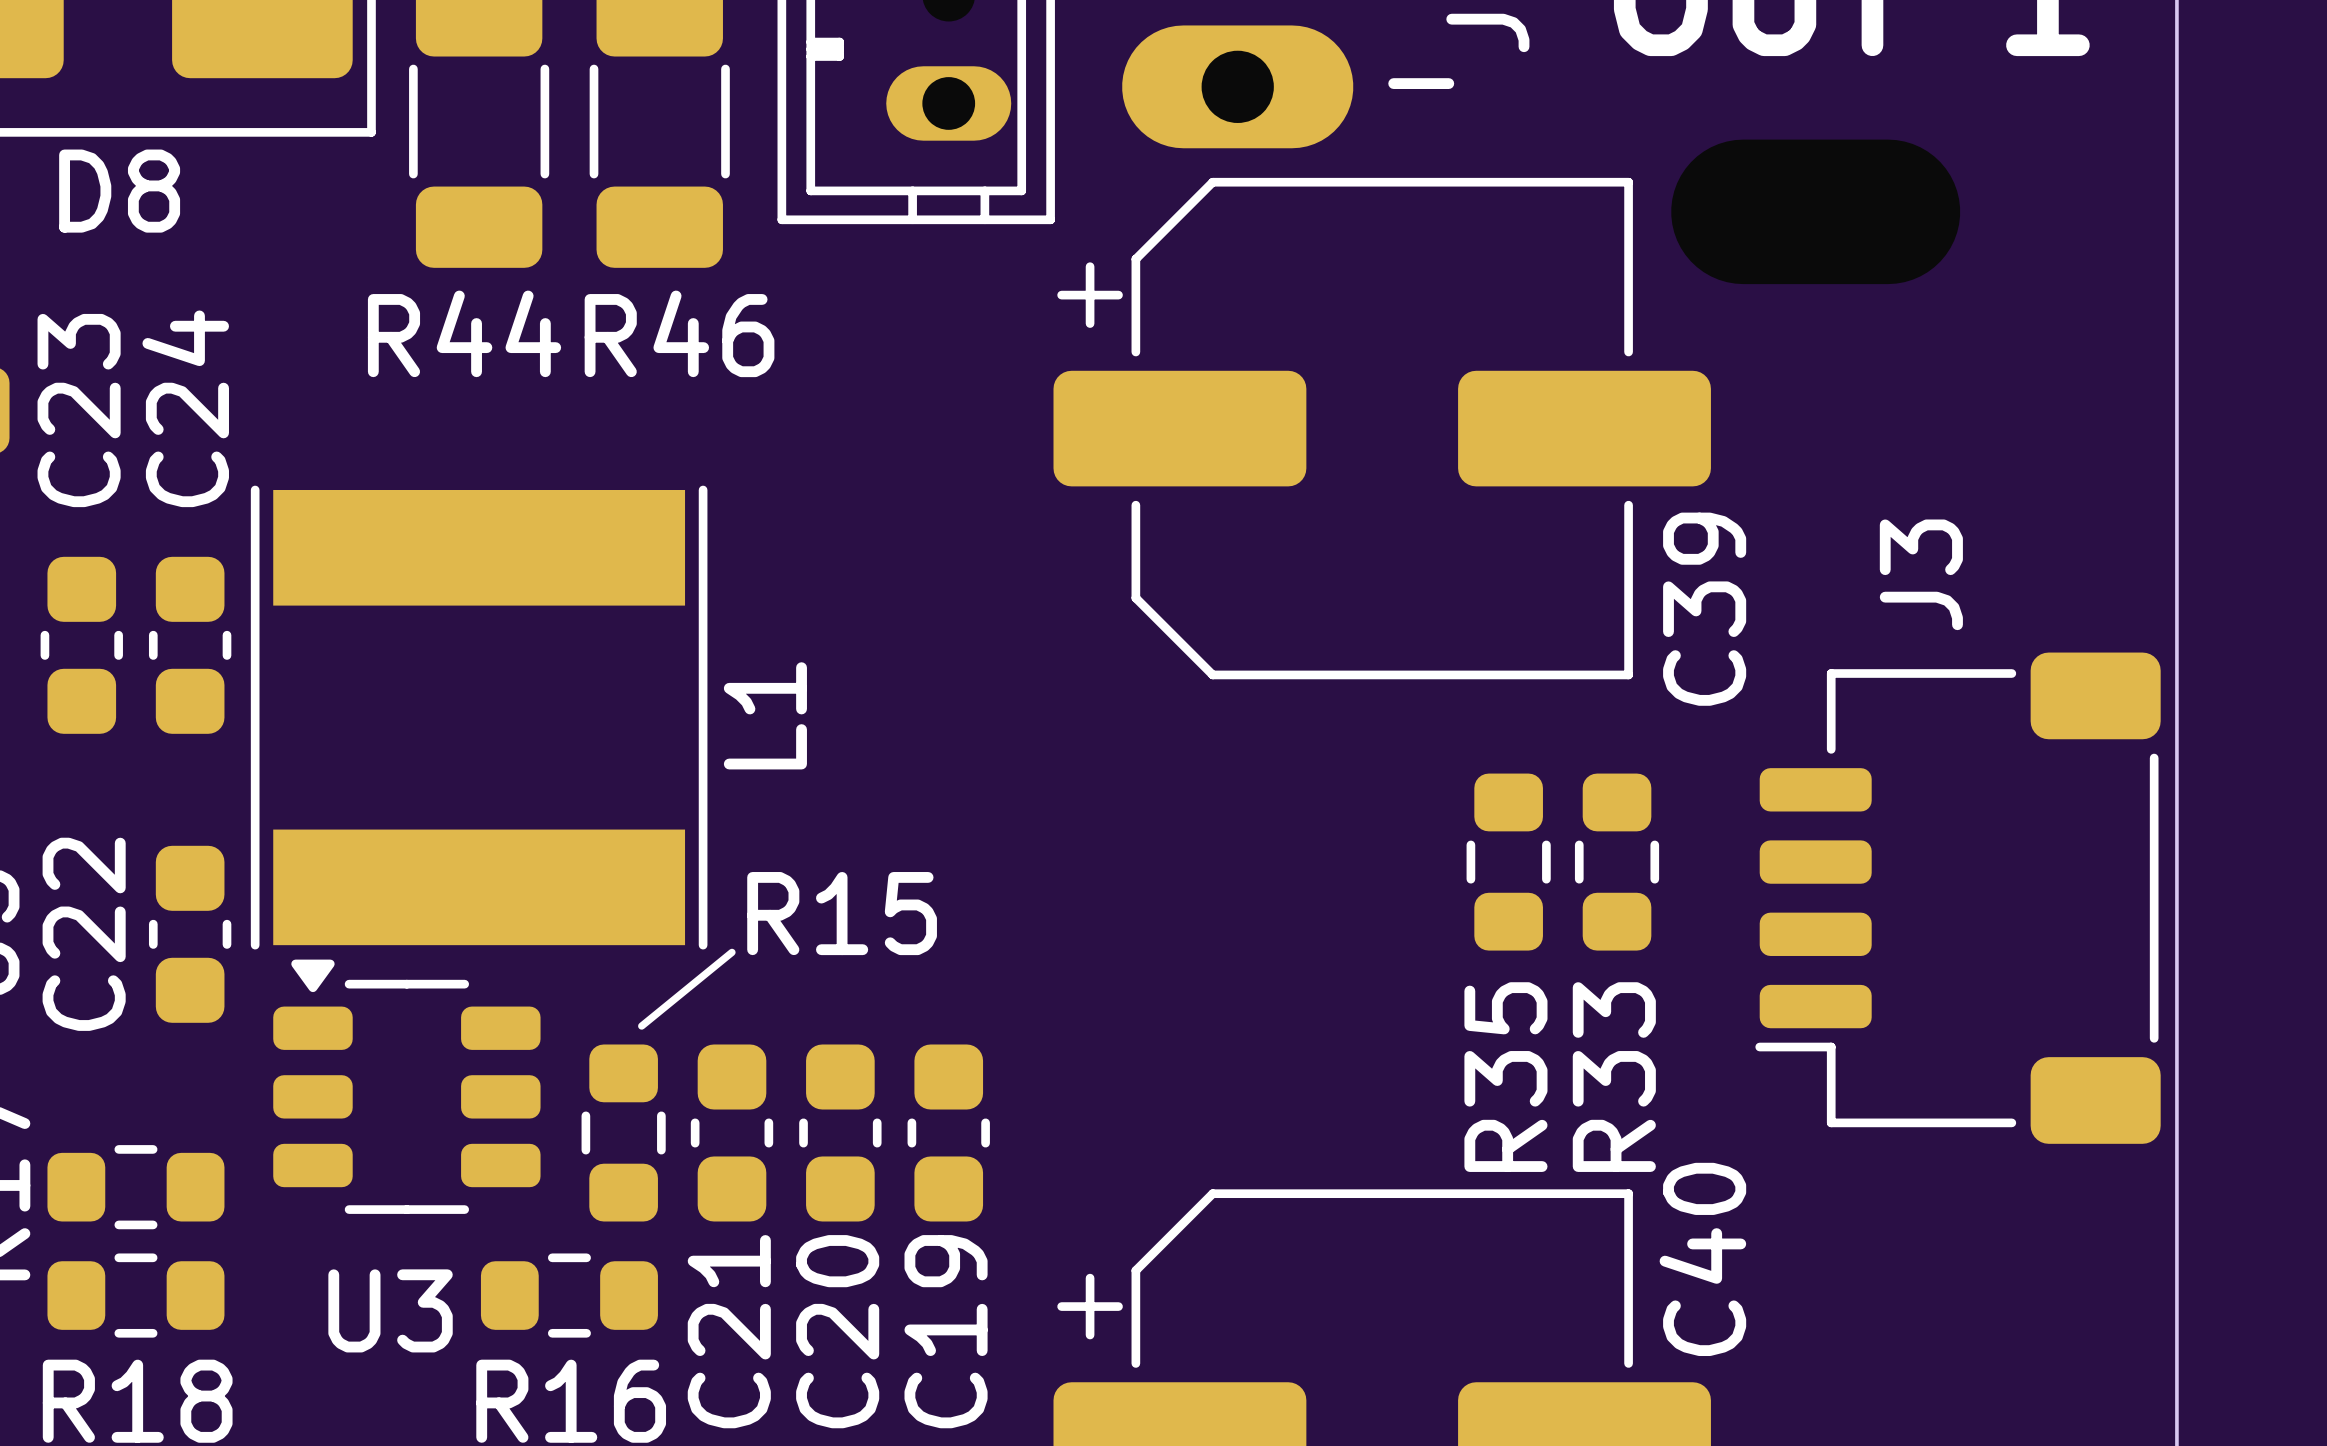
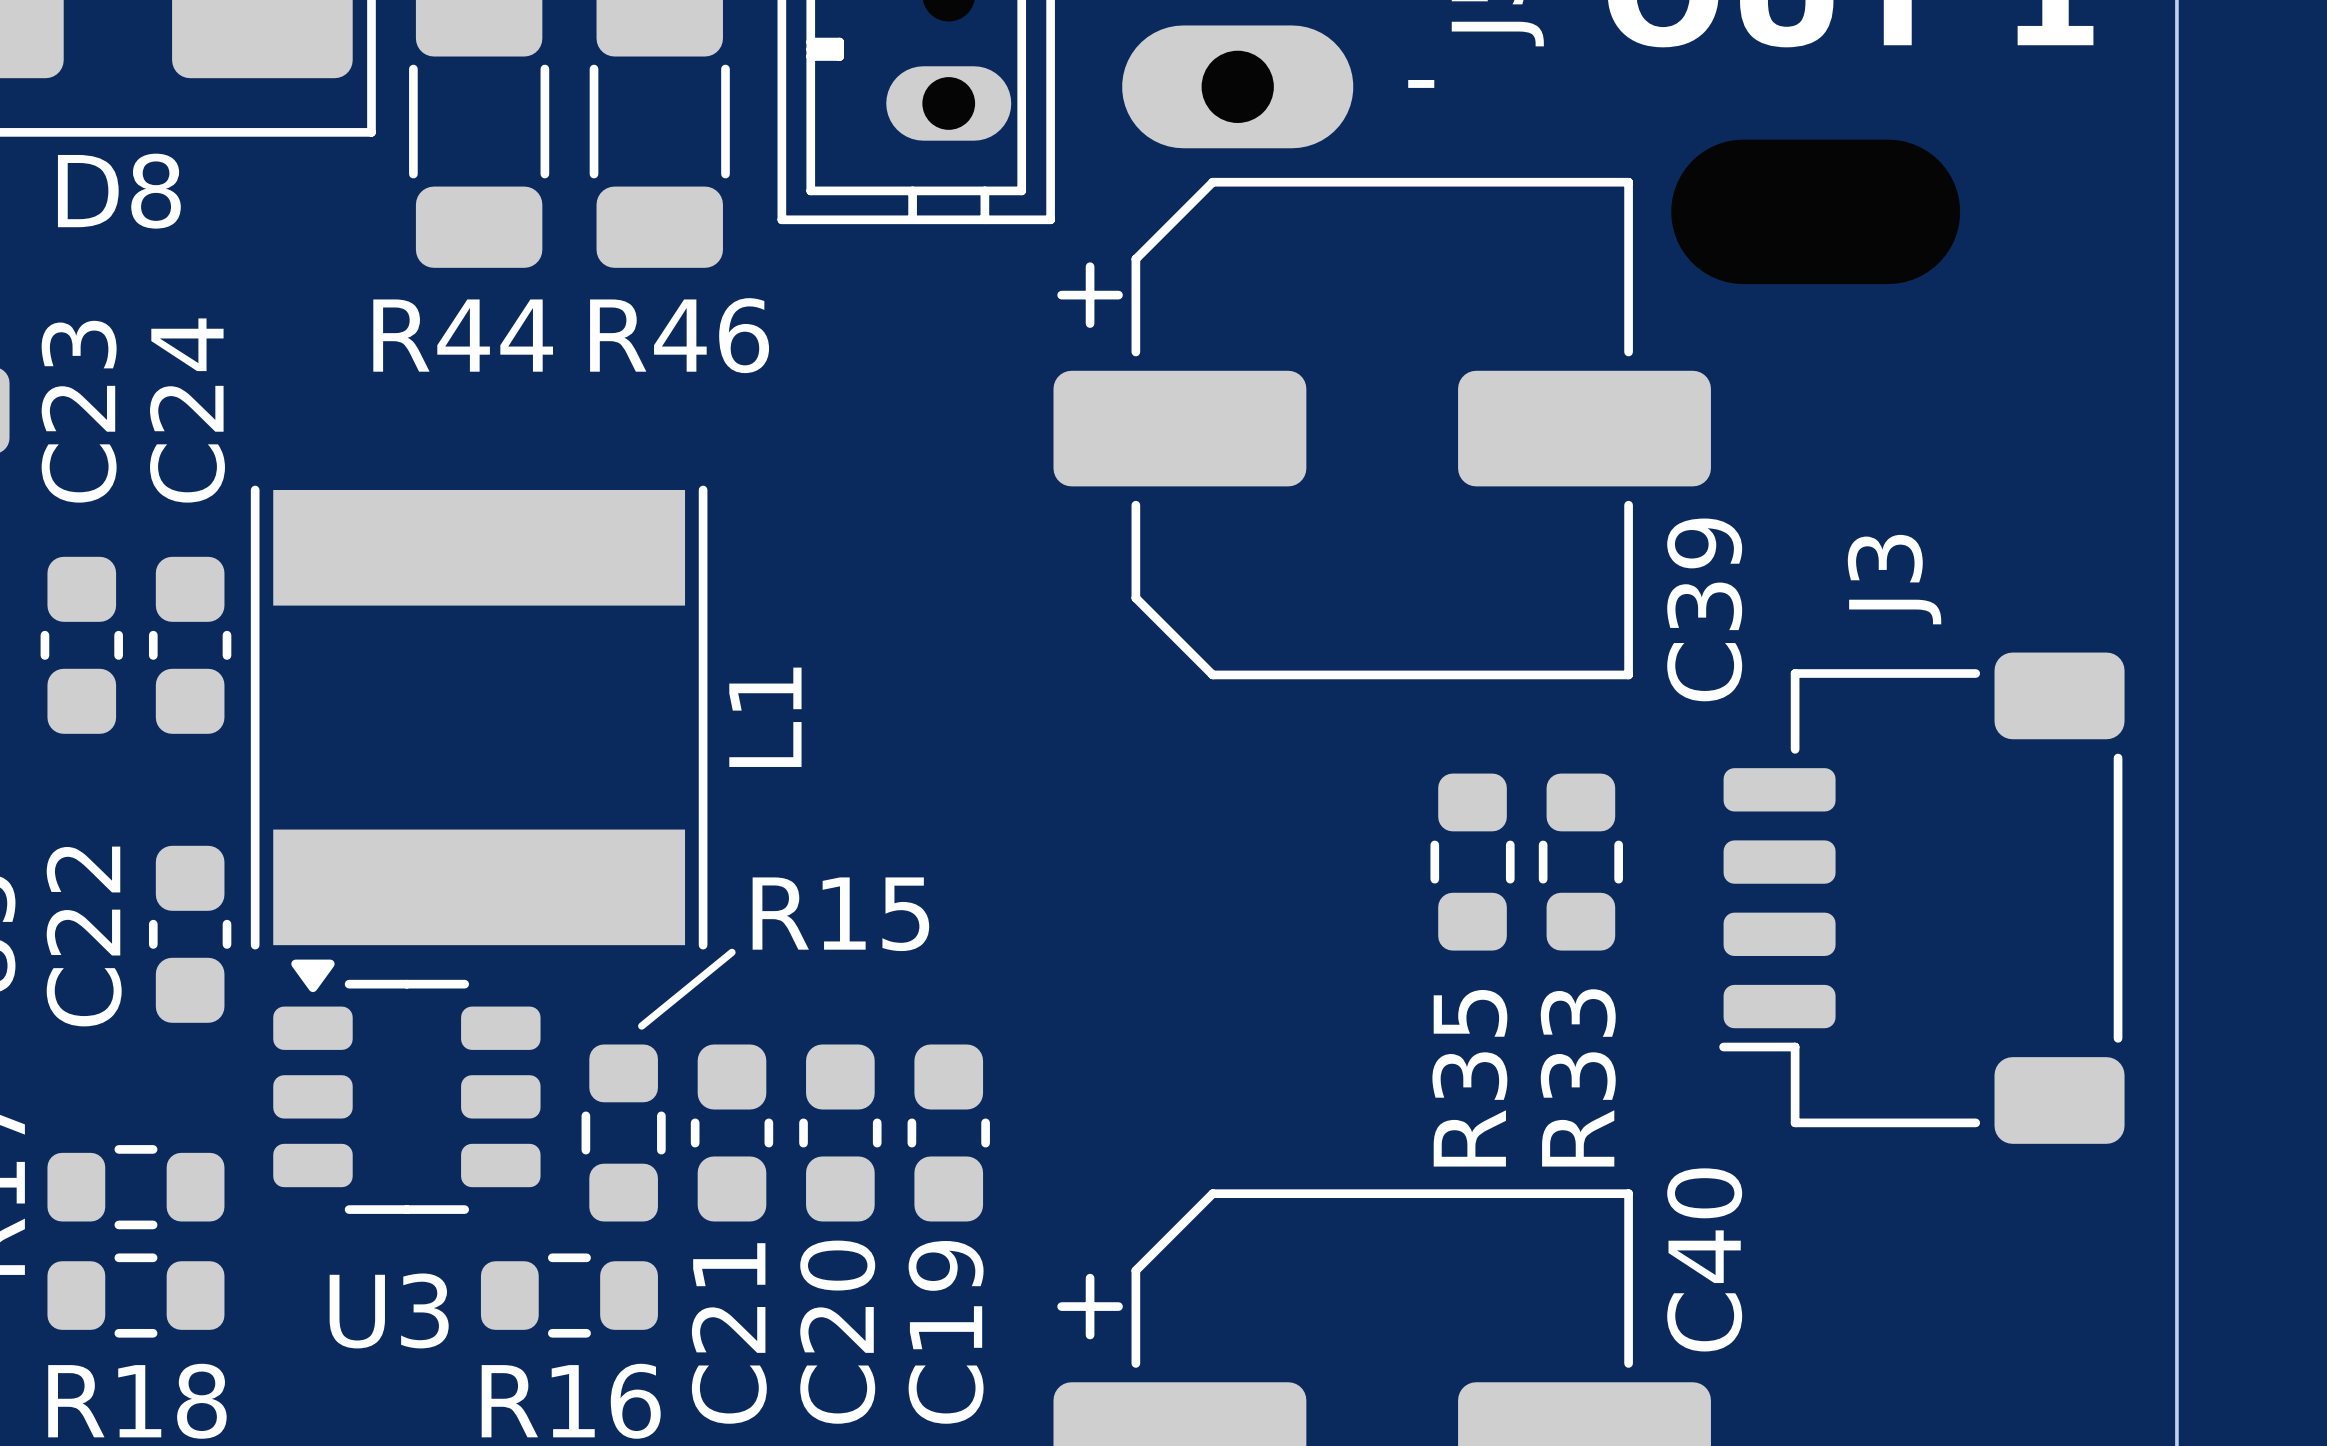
R35 position: (1508, 862) -> (1472, 862)
R33 position: (1617, 862) -> (1580, 862)
J3 position: (1958, 898) -> (1921, 898)

